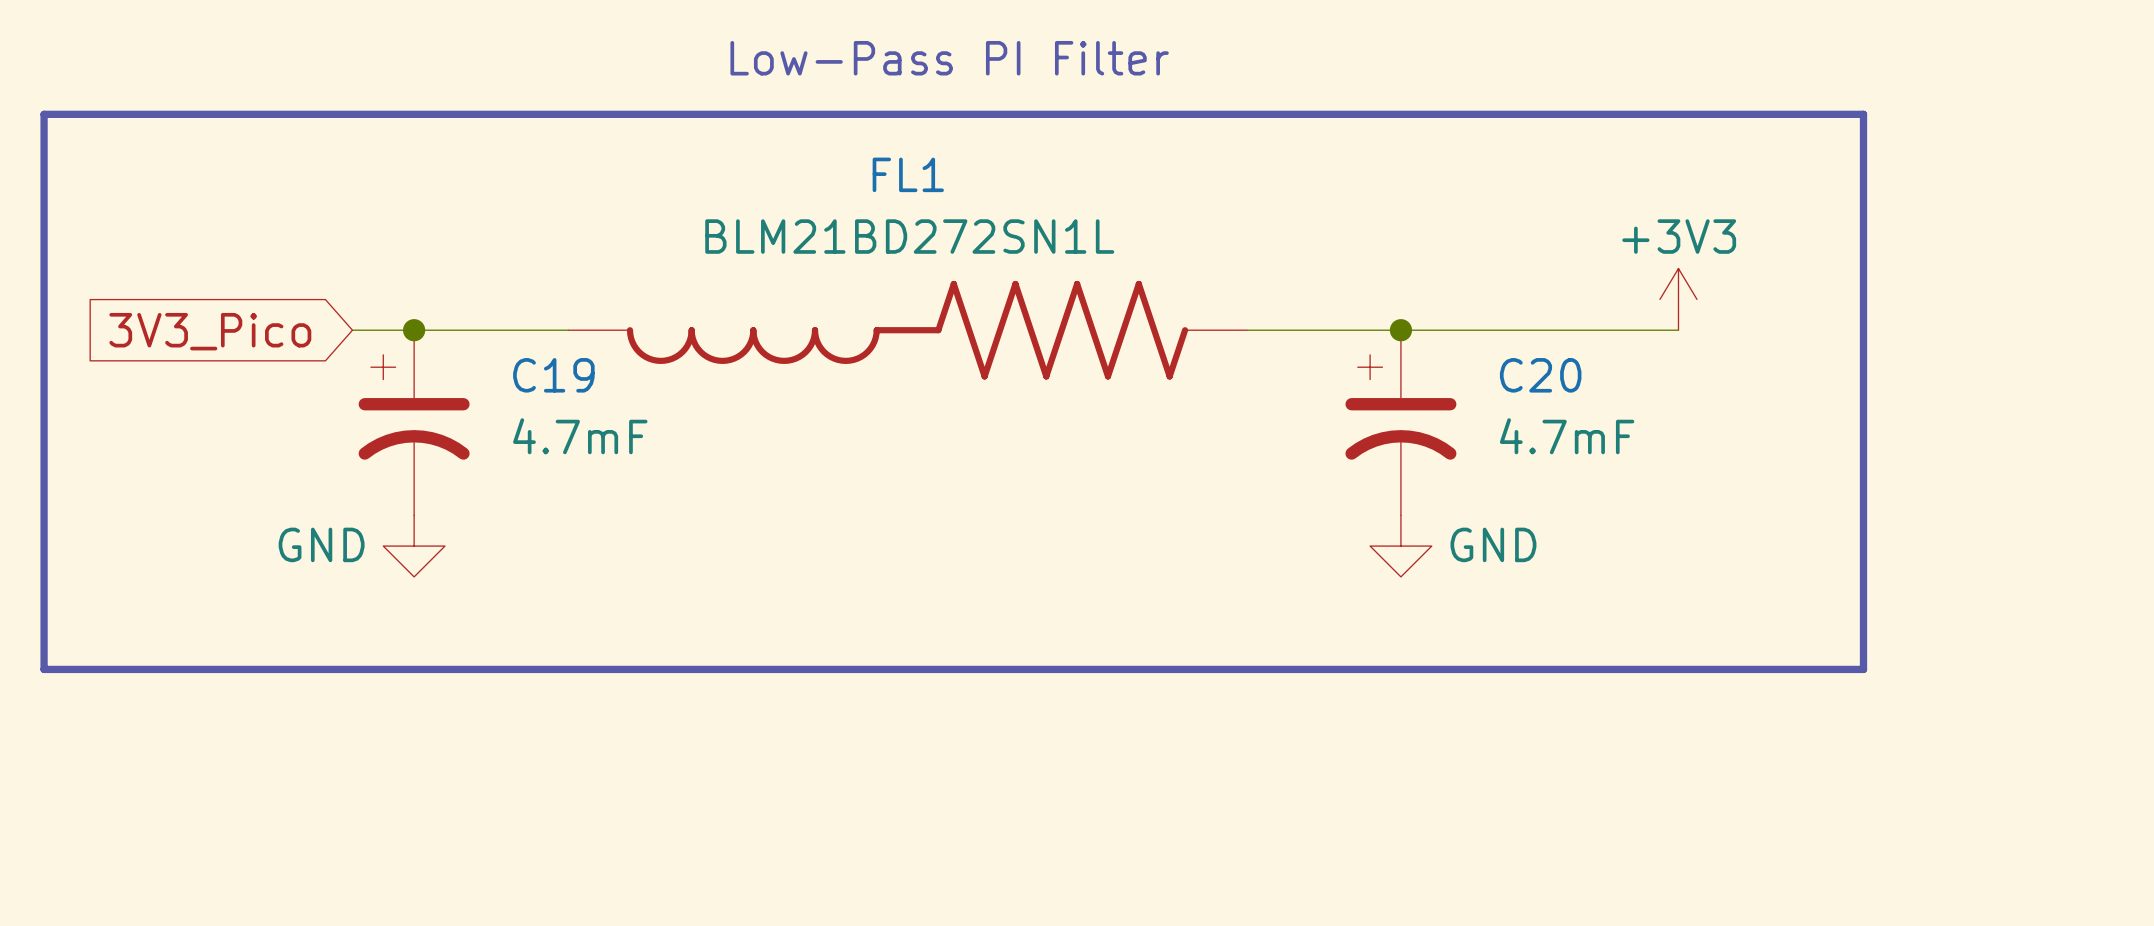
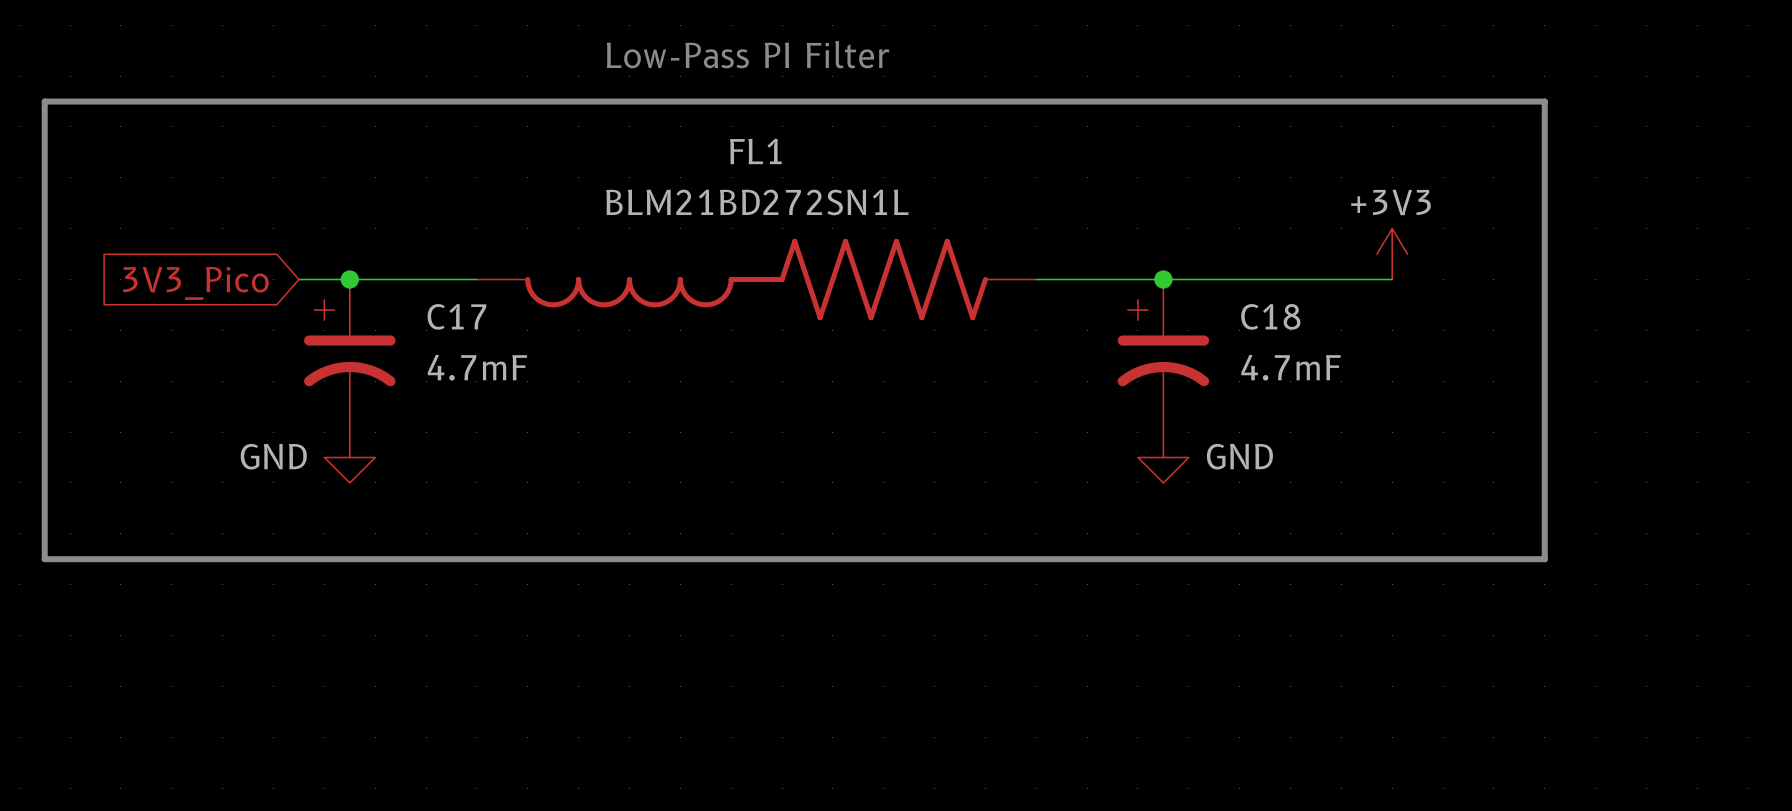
C19 name: C19 (553, 375) -> C17 (456, 316)
C20 name: C20 (1540, 375) -> C18 (1270, 316)

